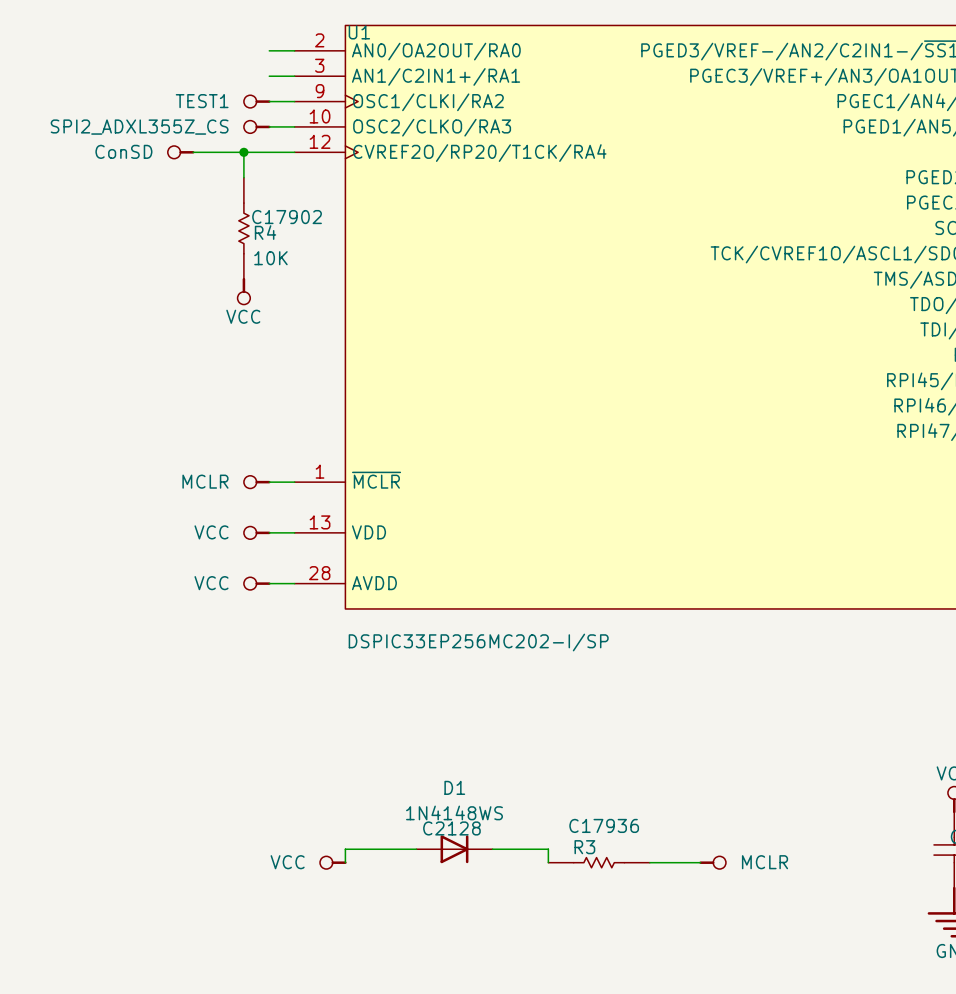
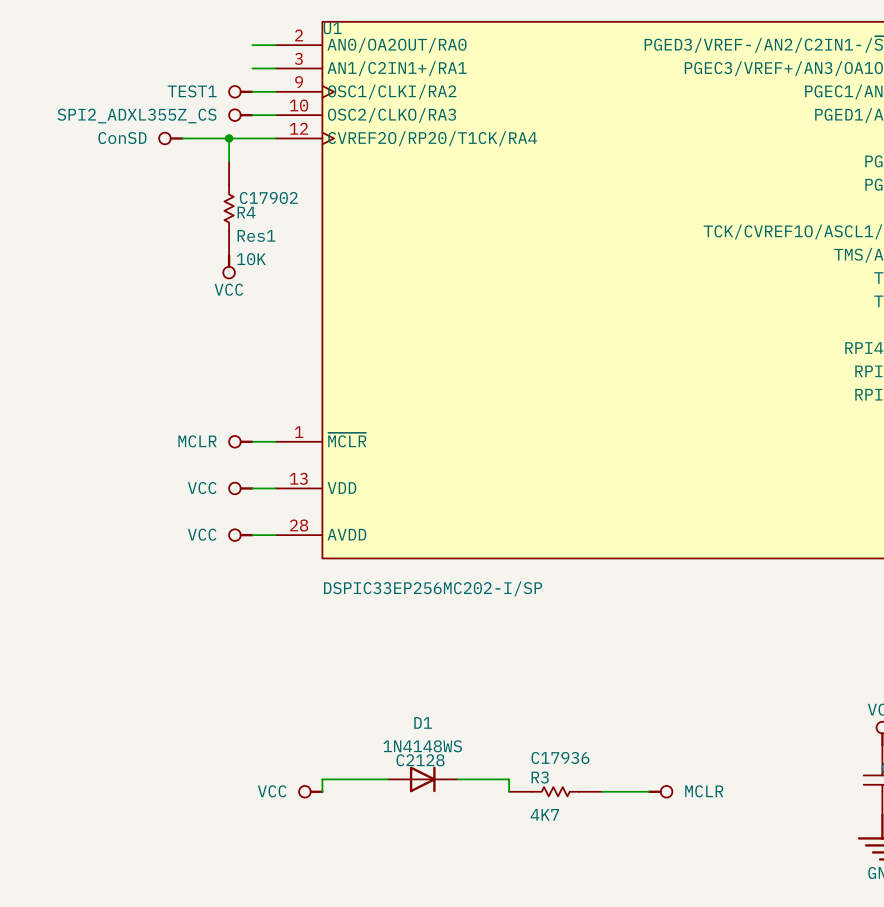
R4 value: 10K (270, 258) -> Res1 (256, 235)
R4 text: none -> 10K (251, 259)
R3 text: none -> 4K7 (544, 814)

